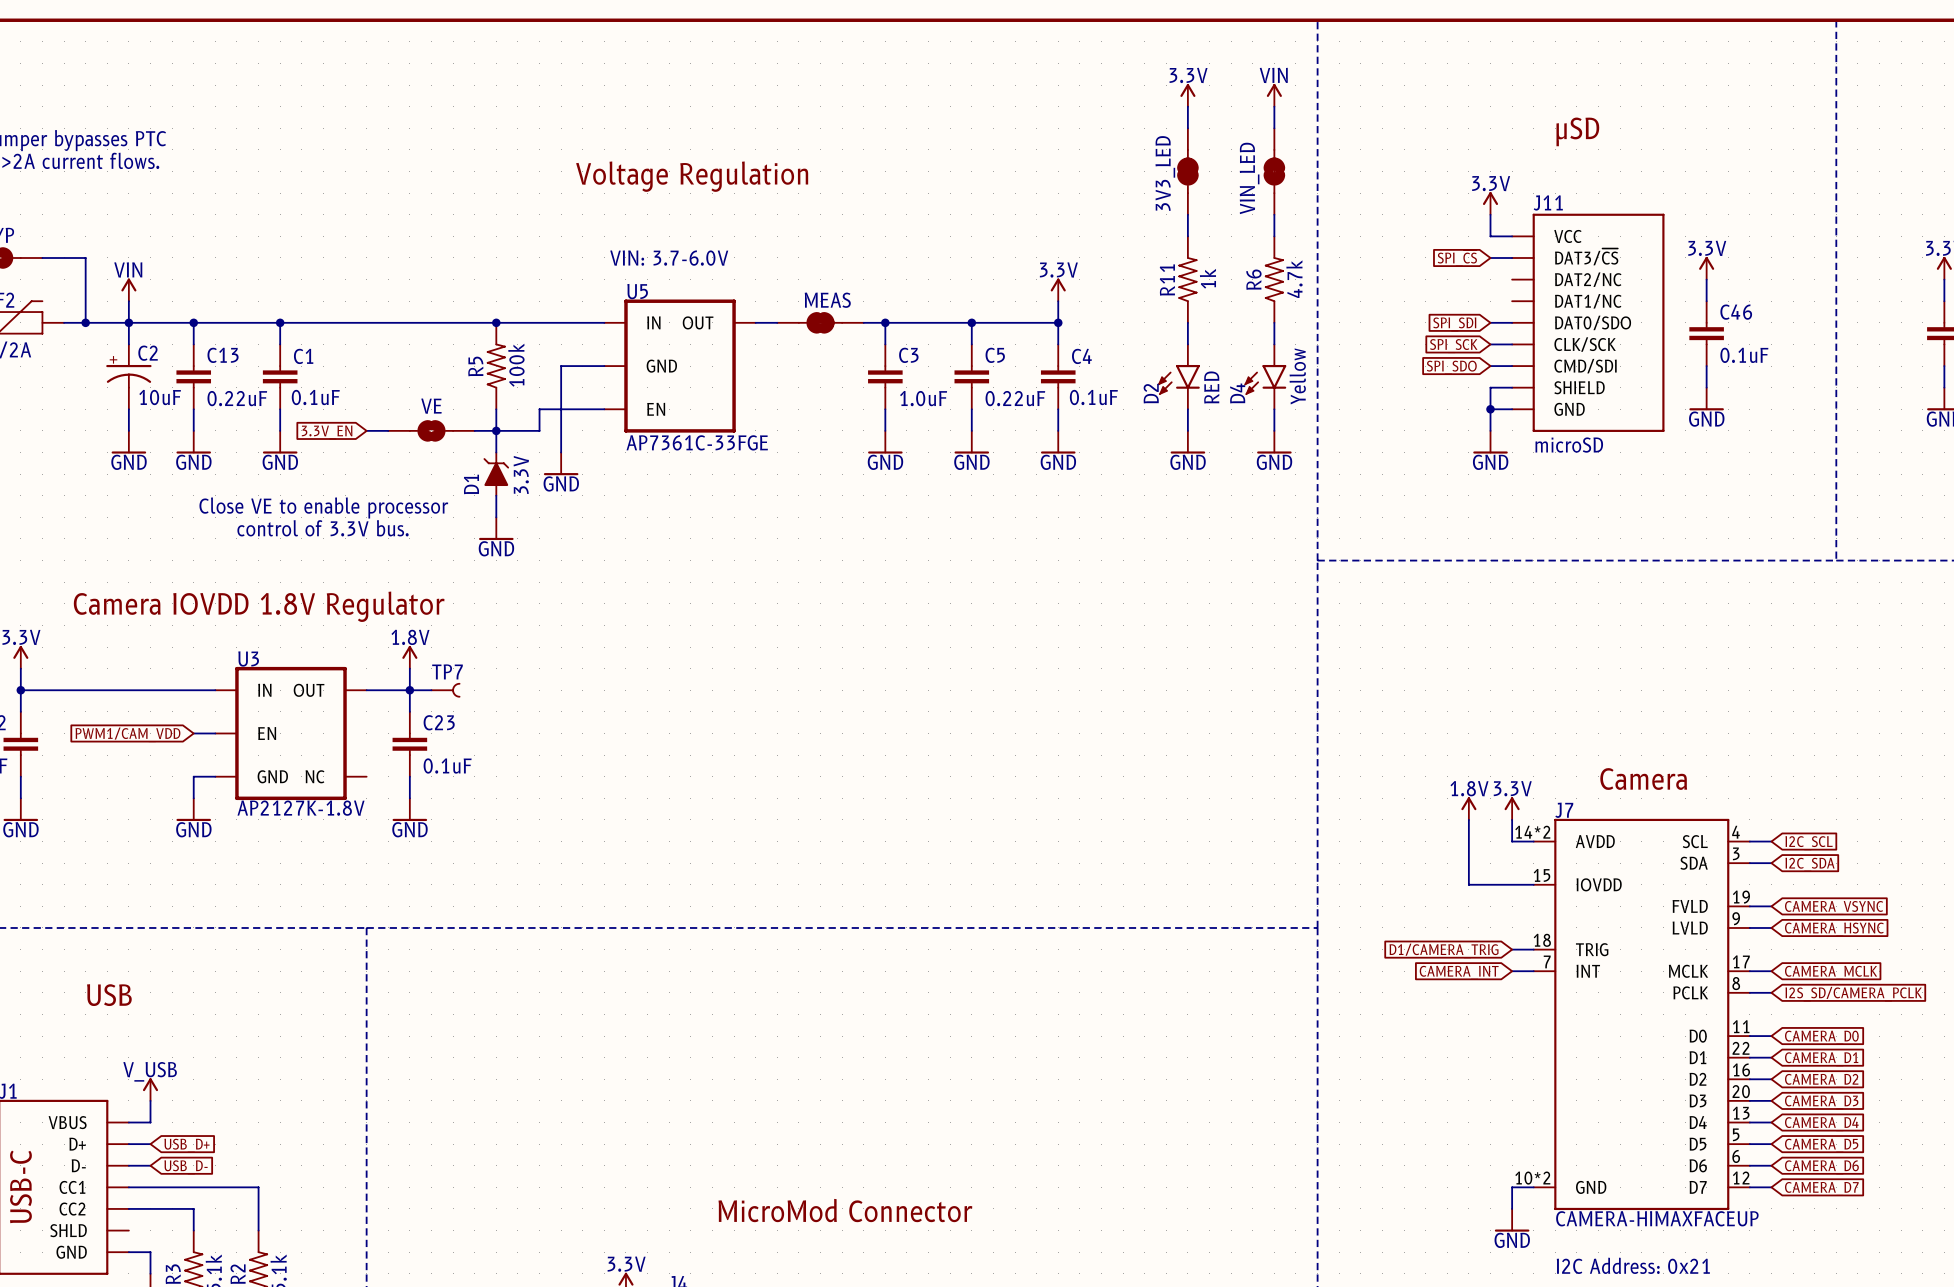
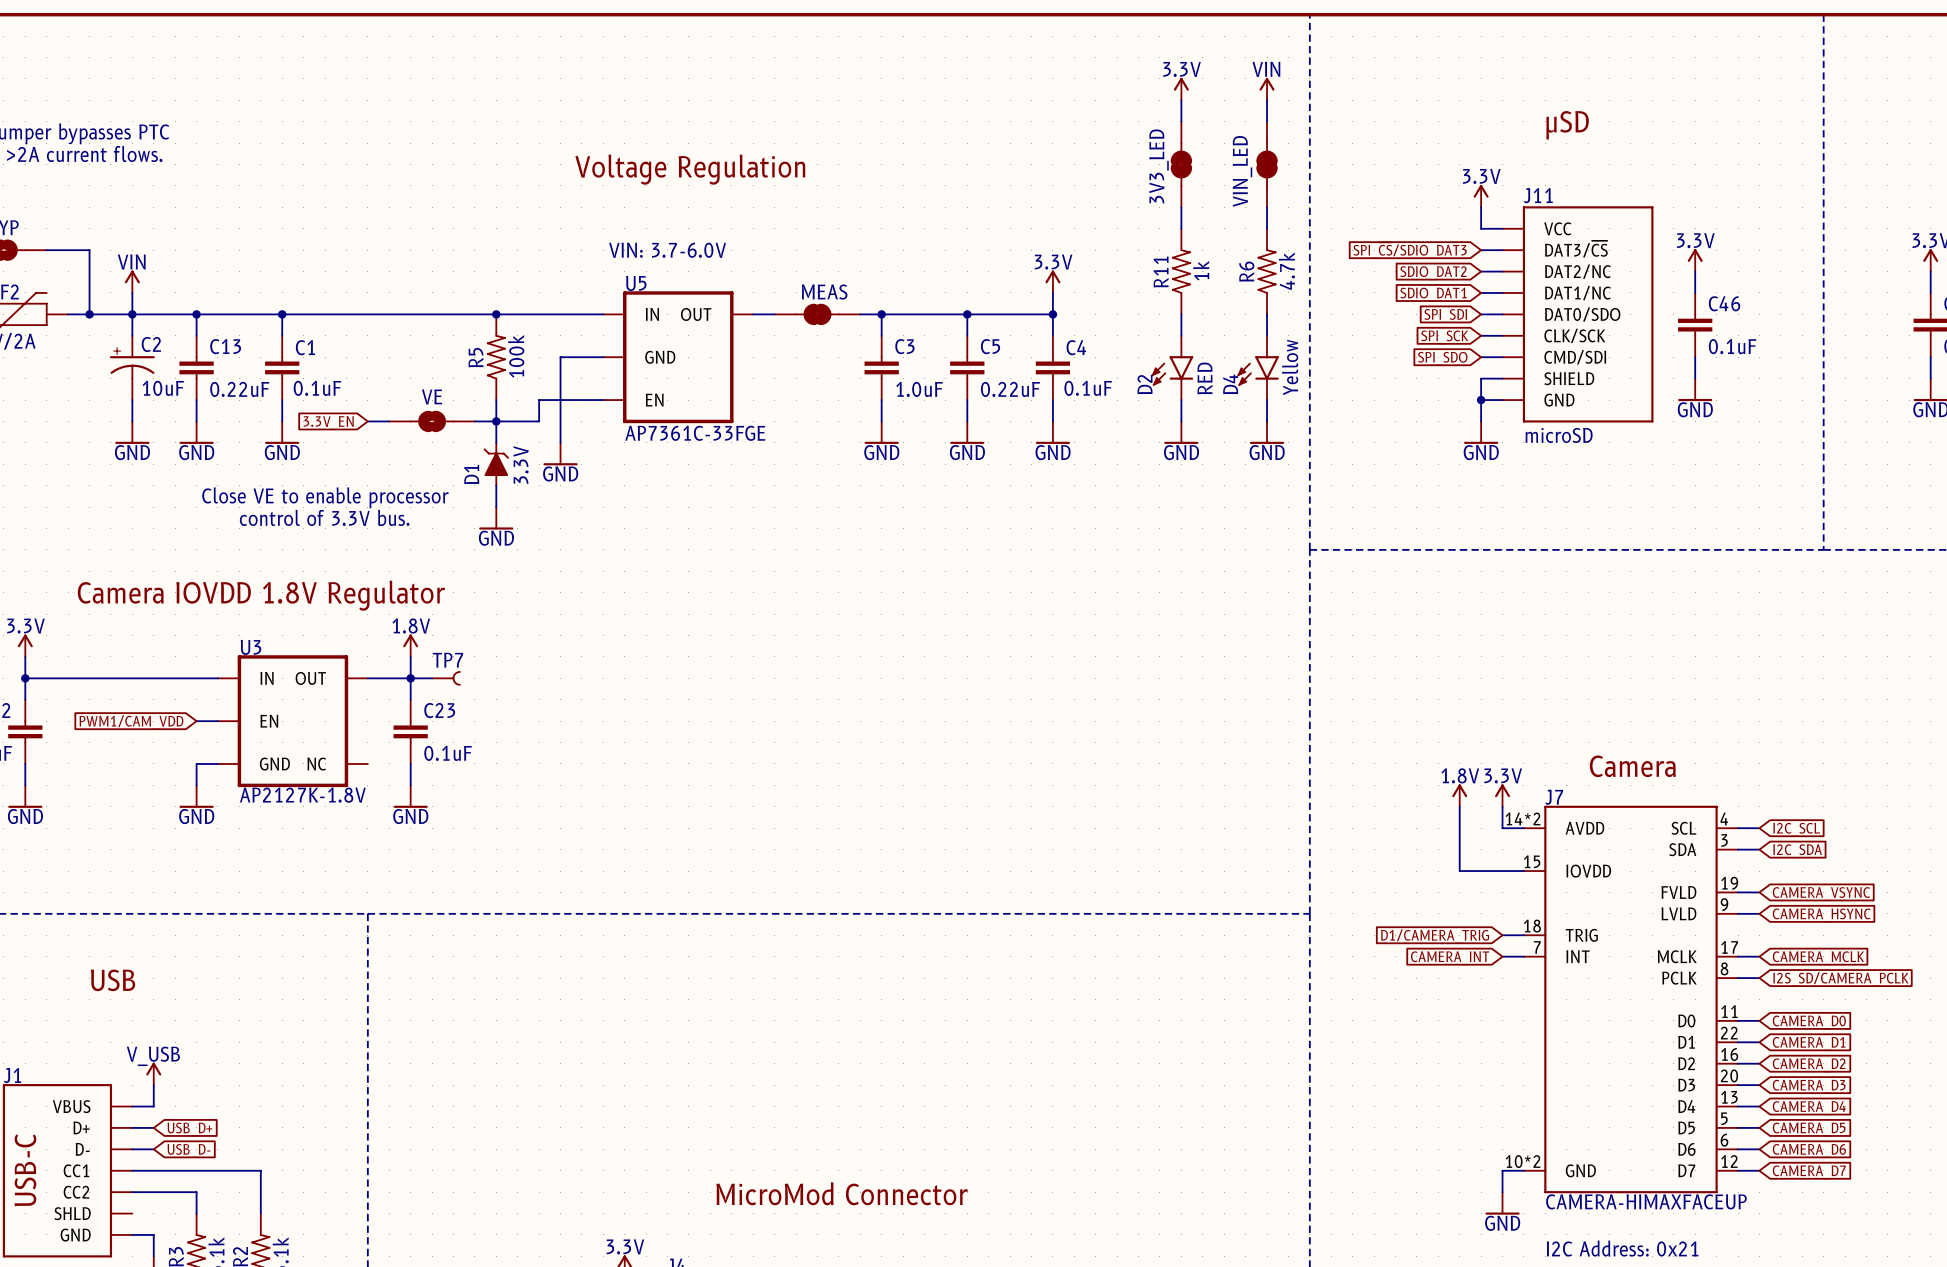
global label: SPI_~{CS} (1457, 258) -> SPI_~{CS}/SDIO_DAT3 (1410, 250)
wire: none -> (1481, 271) (1502, 271)
global label: none -> SDIO_DAT2 (1433, 273)
wire: none -> (1481, 292) (1502, 292)
global label: none -> SDIO_DAT1 (1433, 294)

